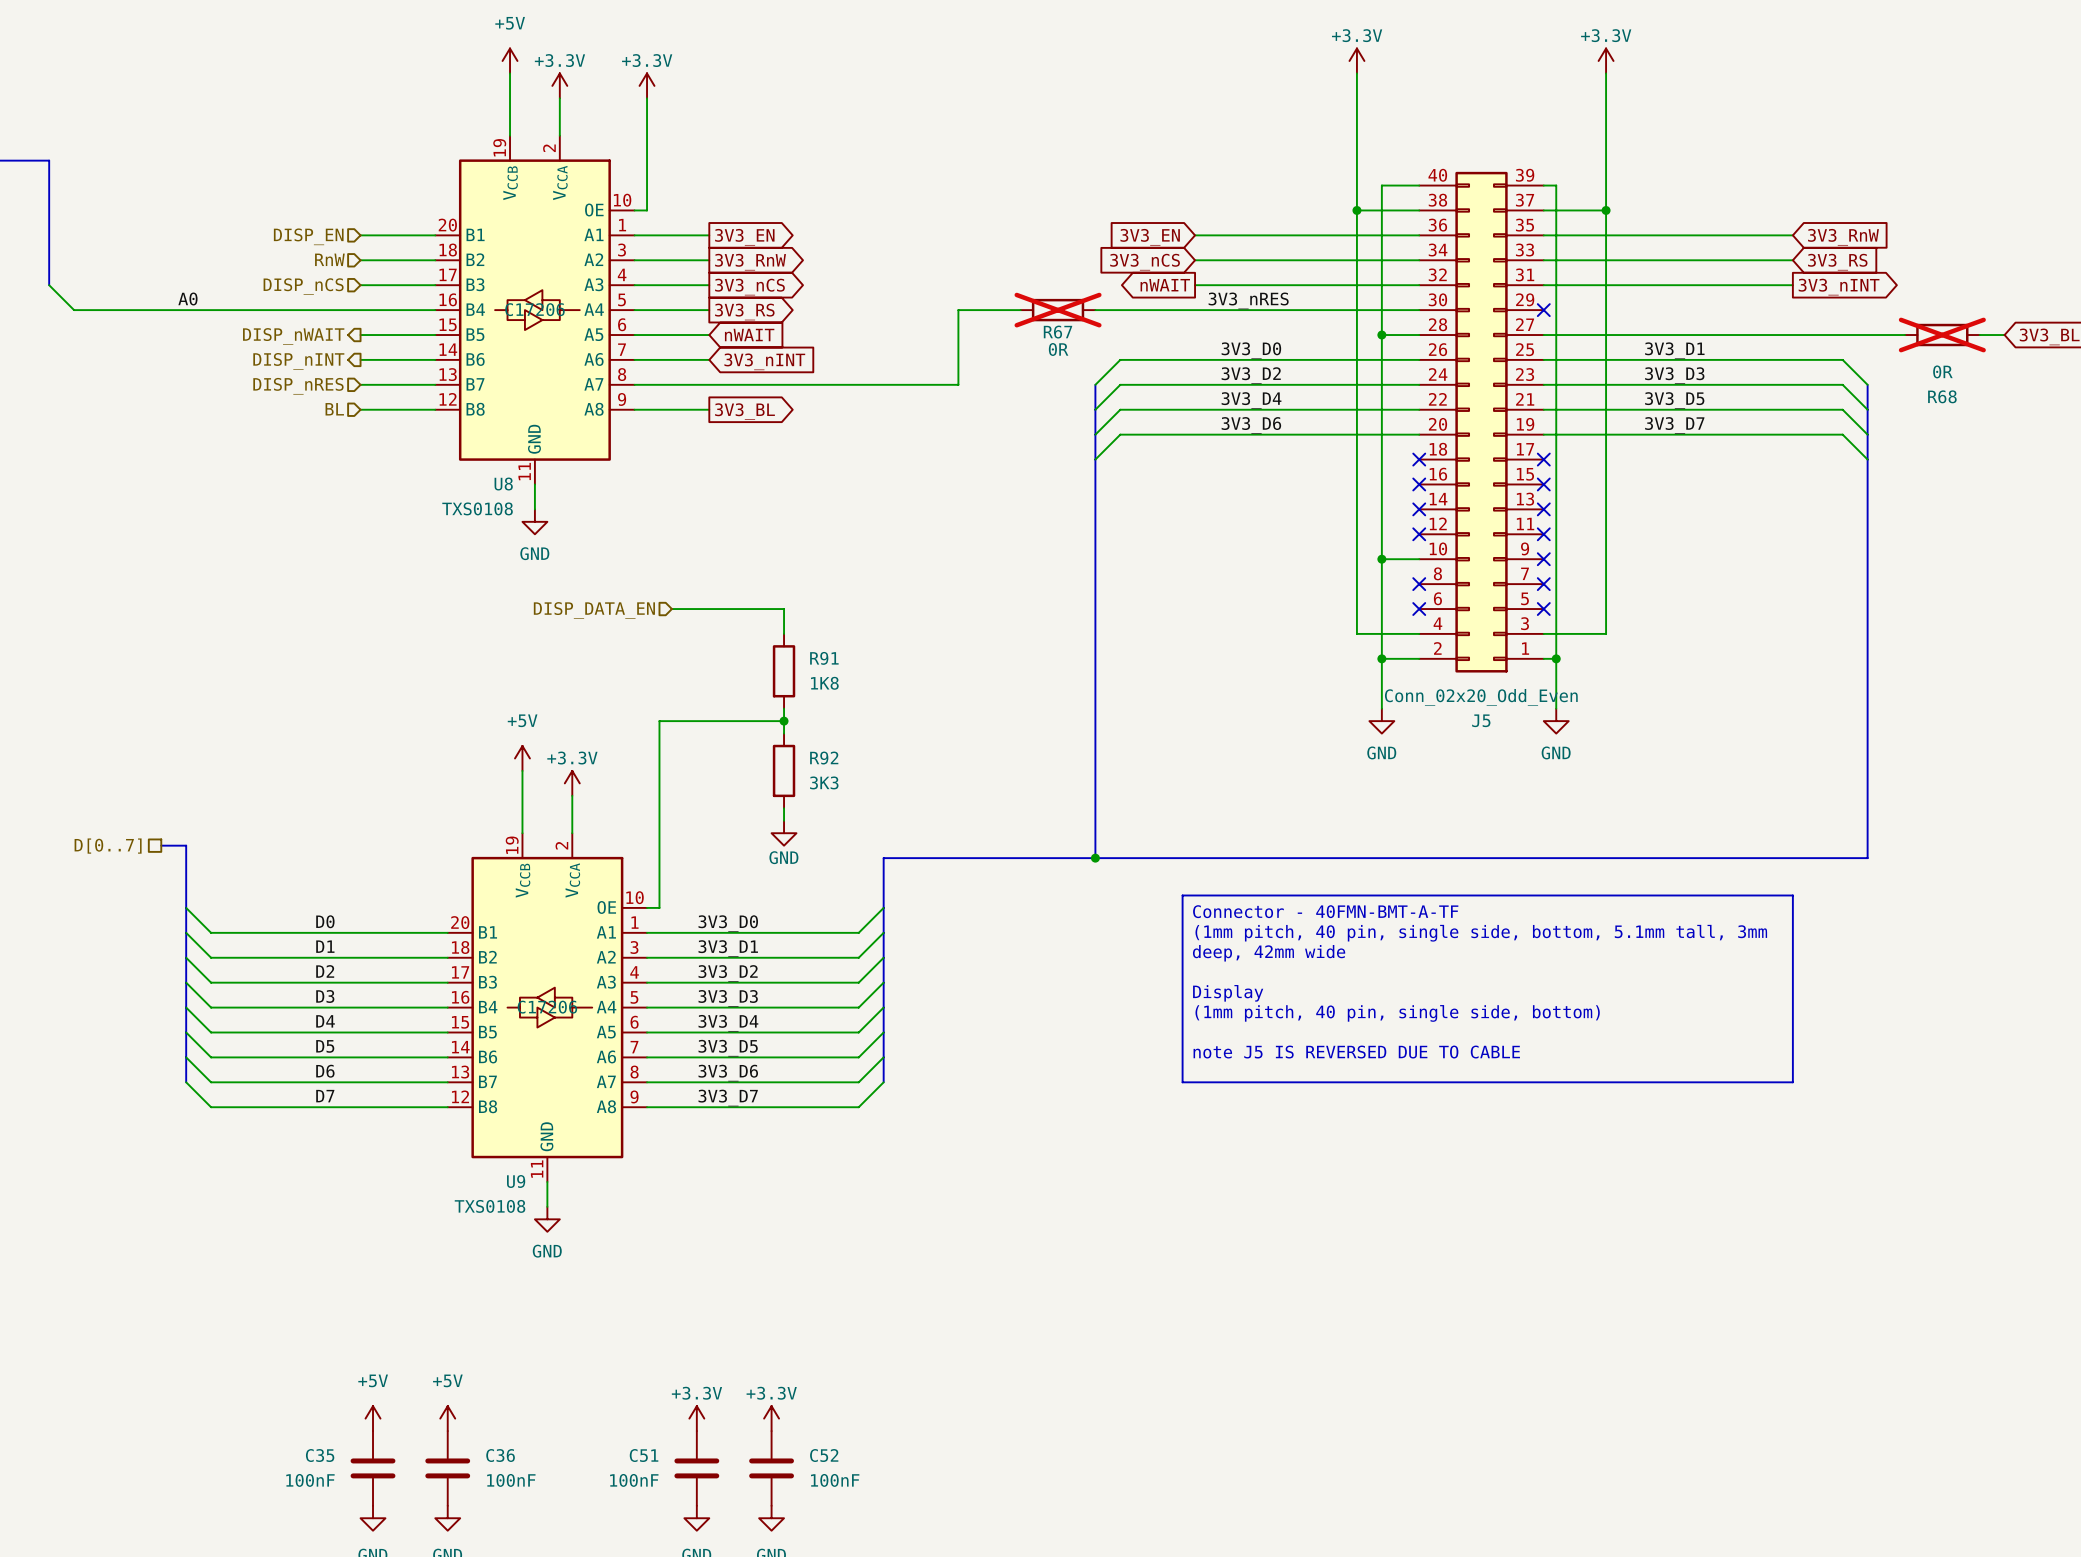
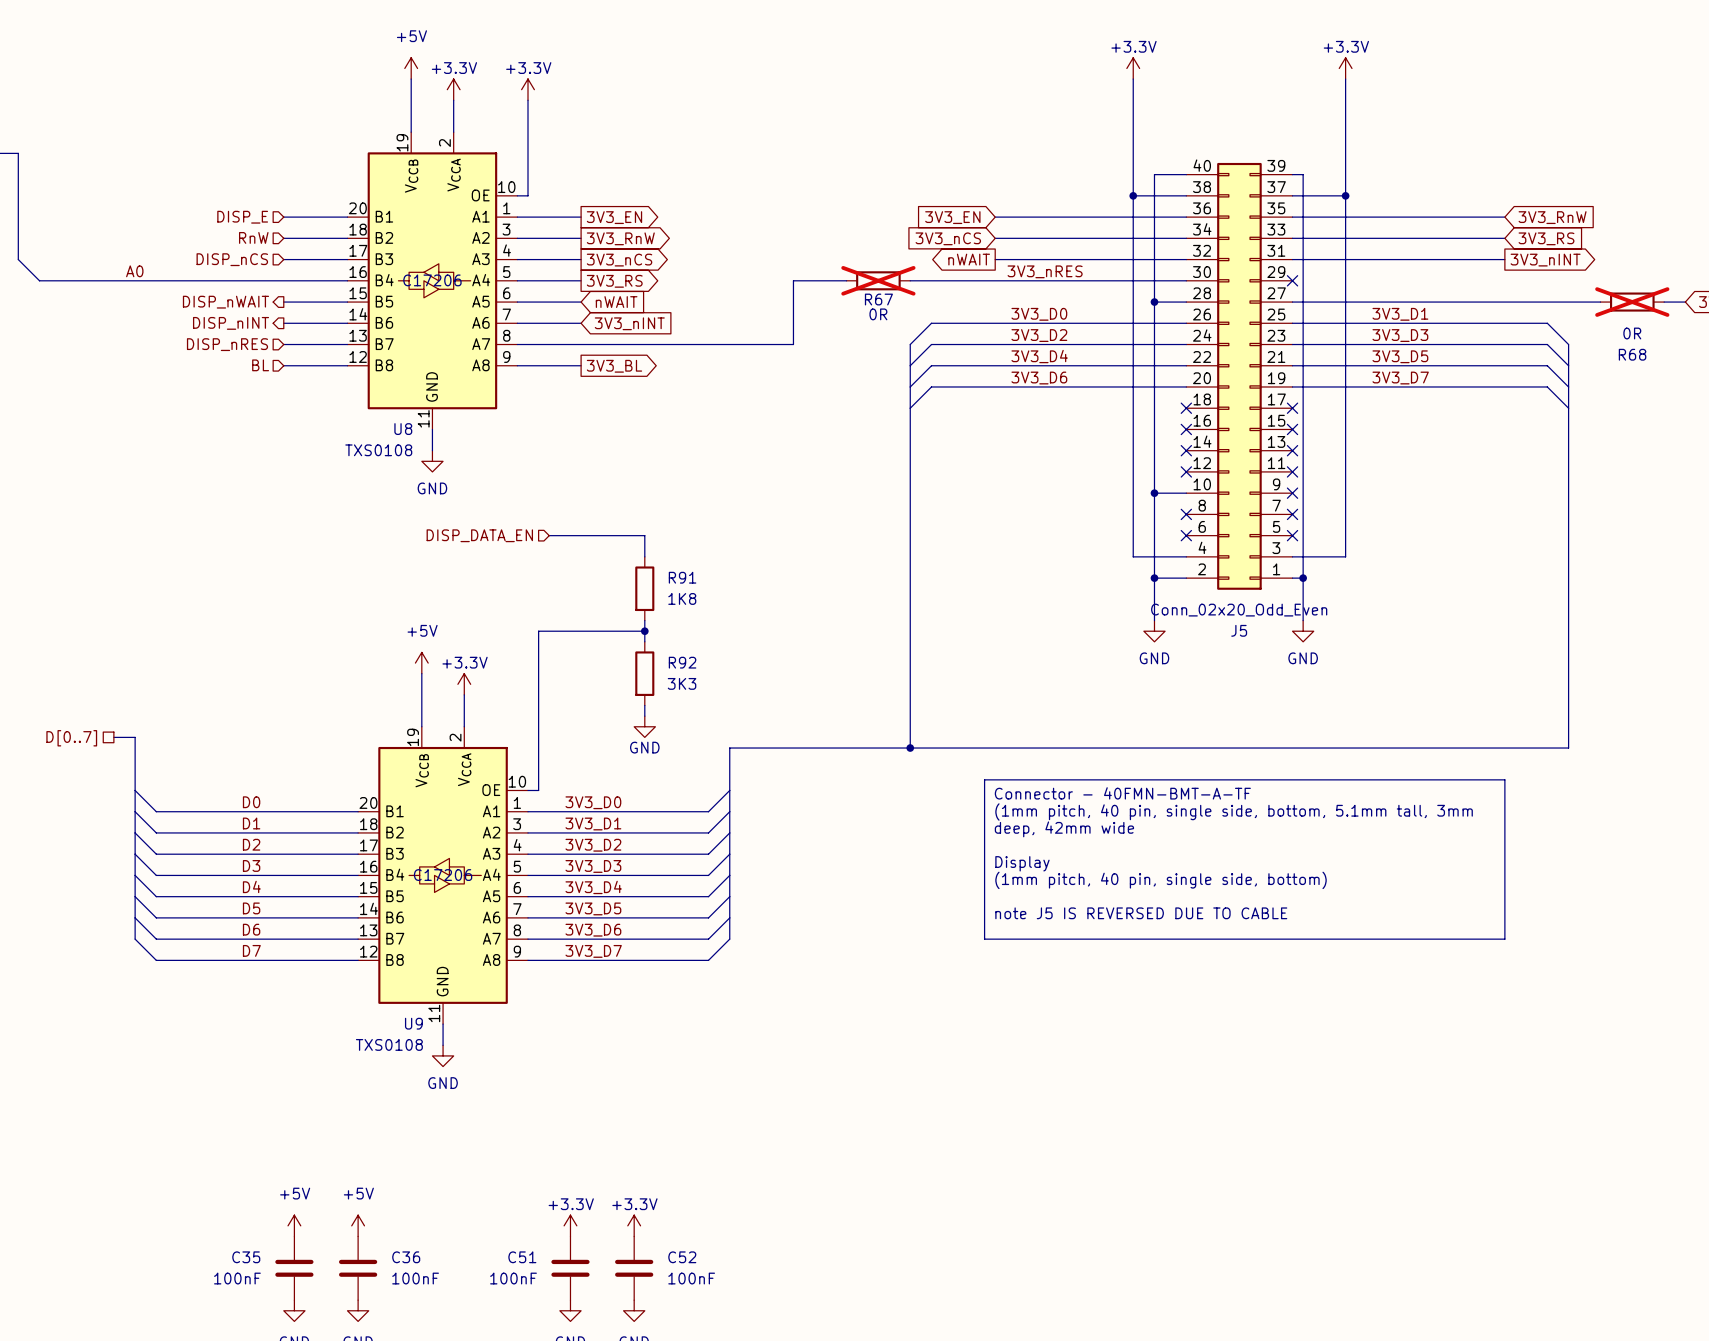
hierarchical label: DISP_EN (308, 236) -> DISP_E (242, 217)

